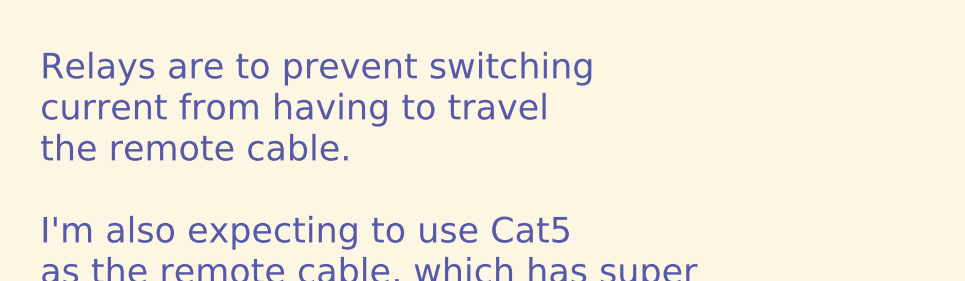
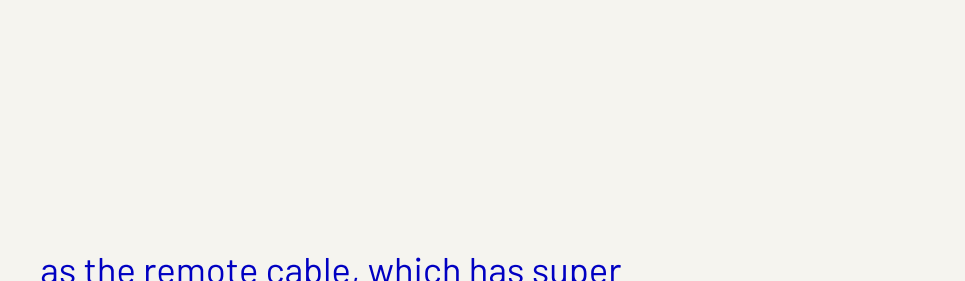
text: Relays are to prevent switching (317, 68) -> none
text: current from having to travel (293, 109) -> none
text: the remote cable. (194, 147) -> none
text: I'm also expecting to use Cat5 (306, 232) -> none

